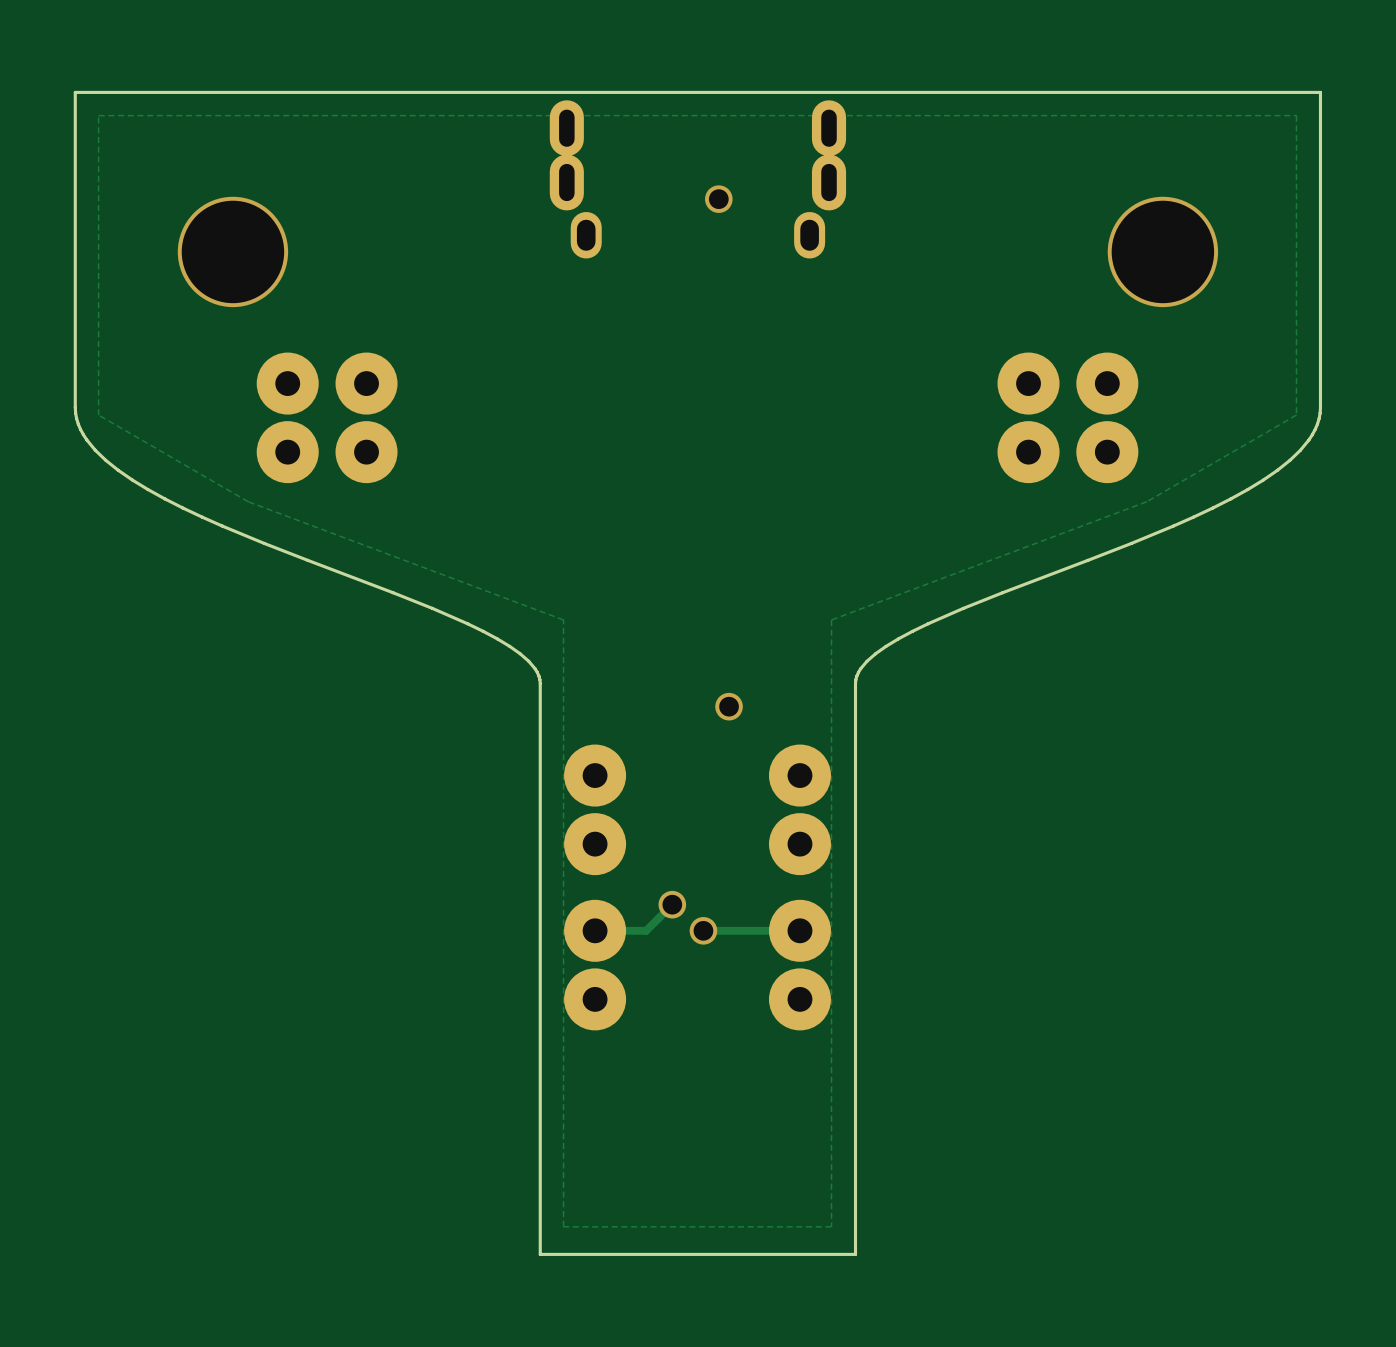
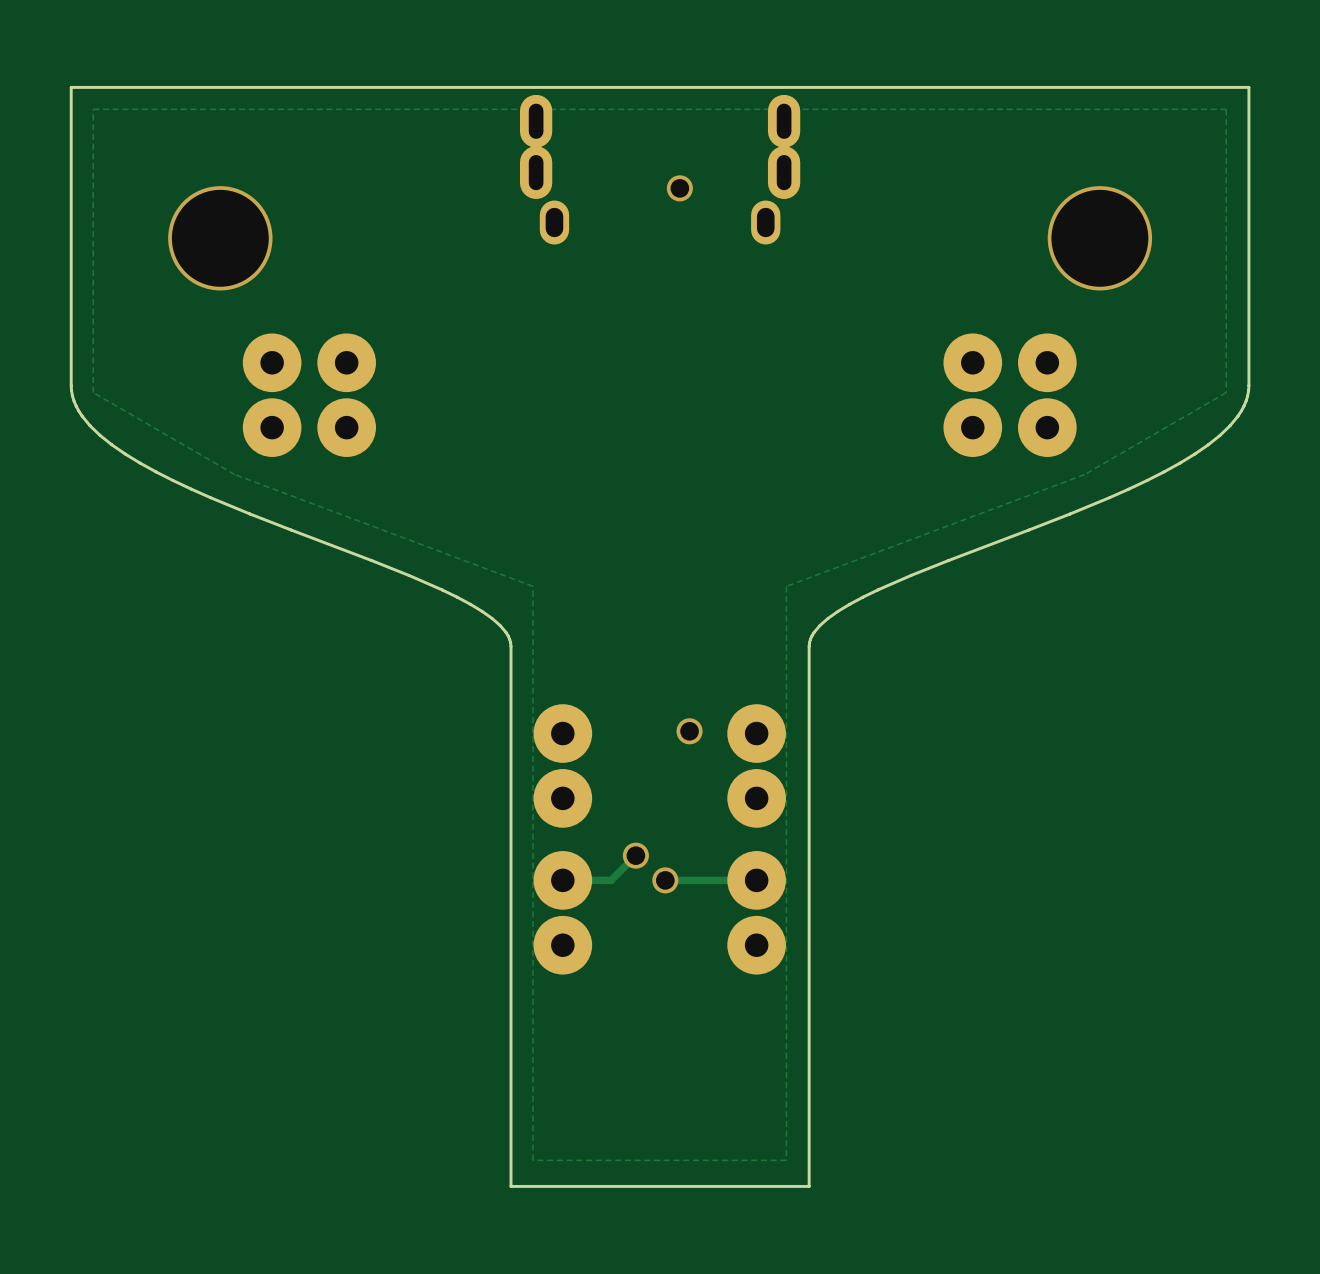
via position: (729, 706) -> (689, 731)

